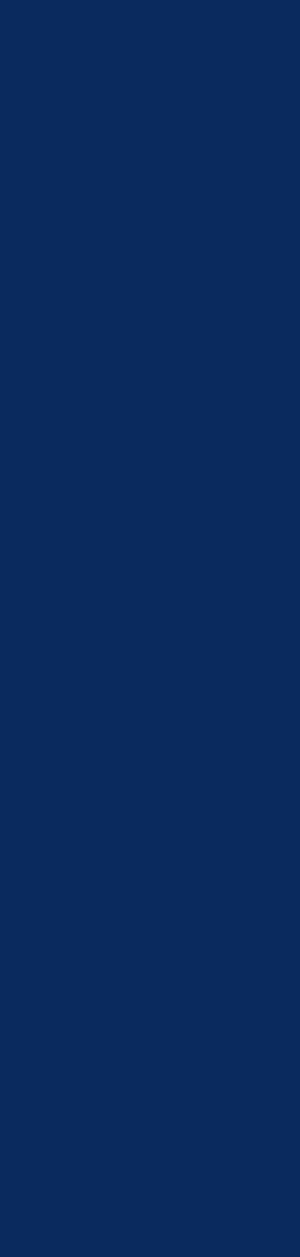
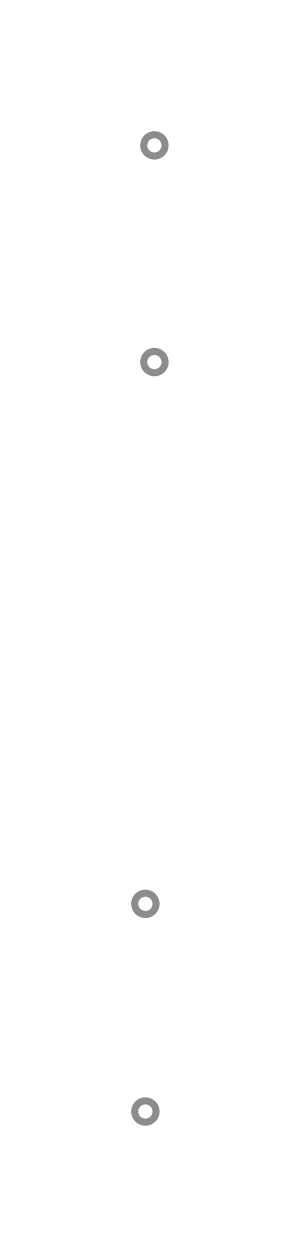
via: none -> (154, 145)
via: none -> (154, 362)
via: none -> (145, 903)
via: none -> (145, 1111)

